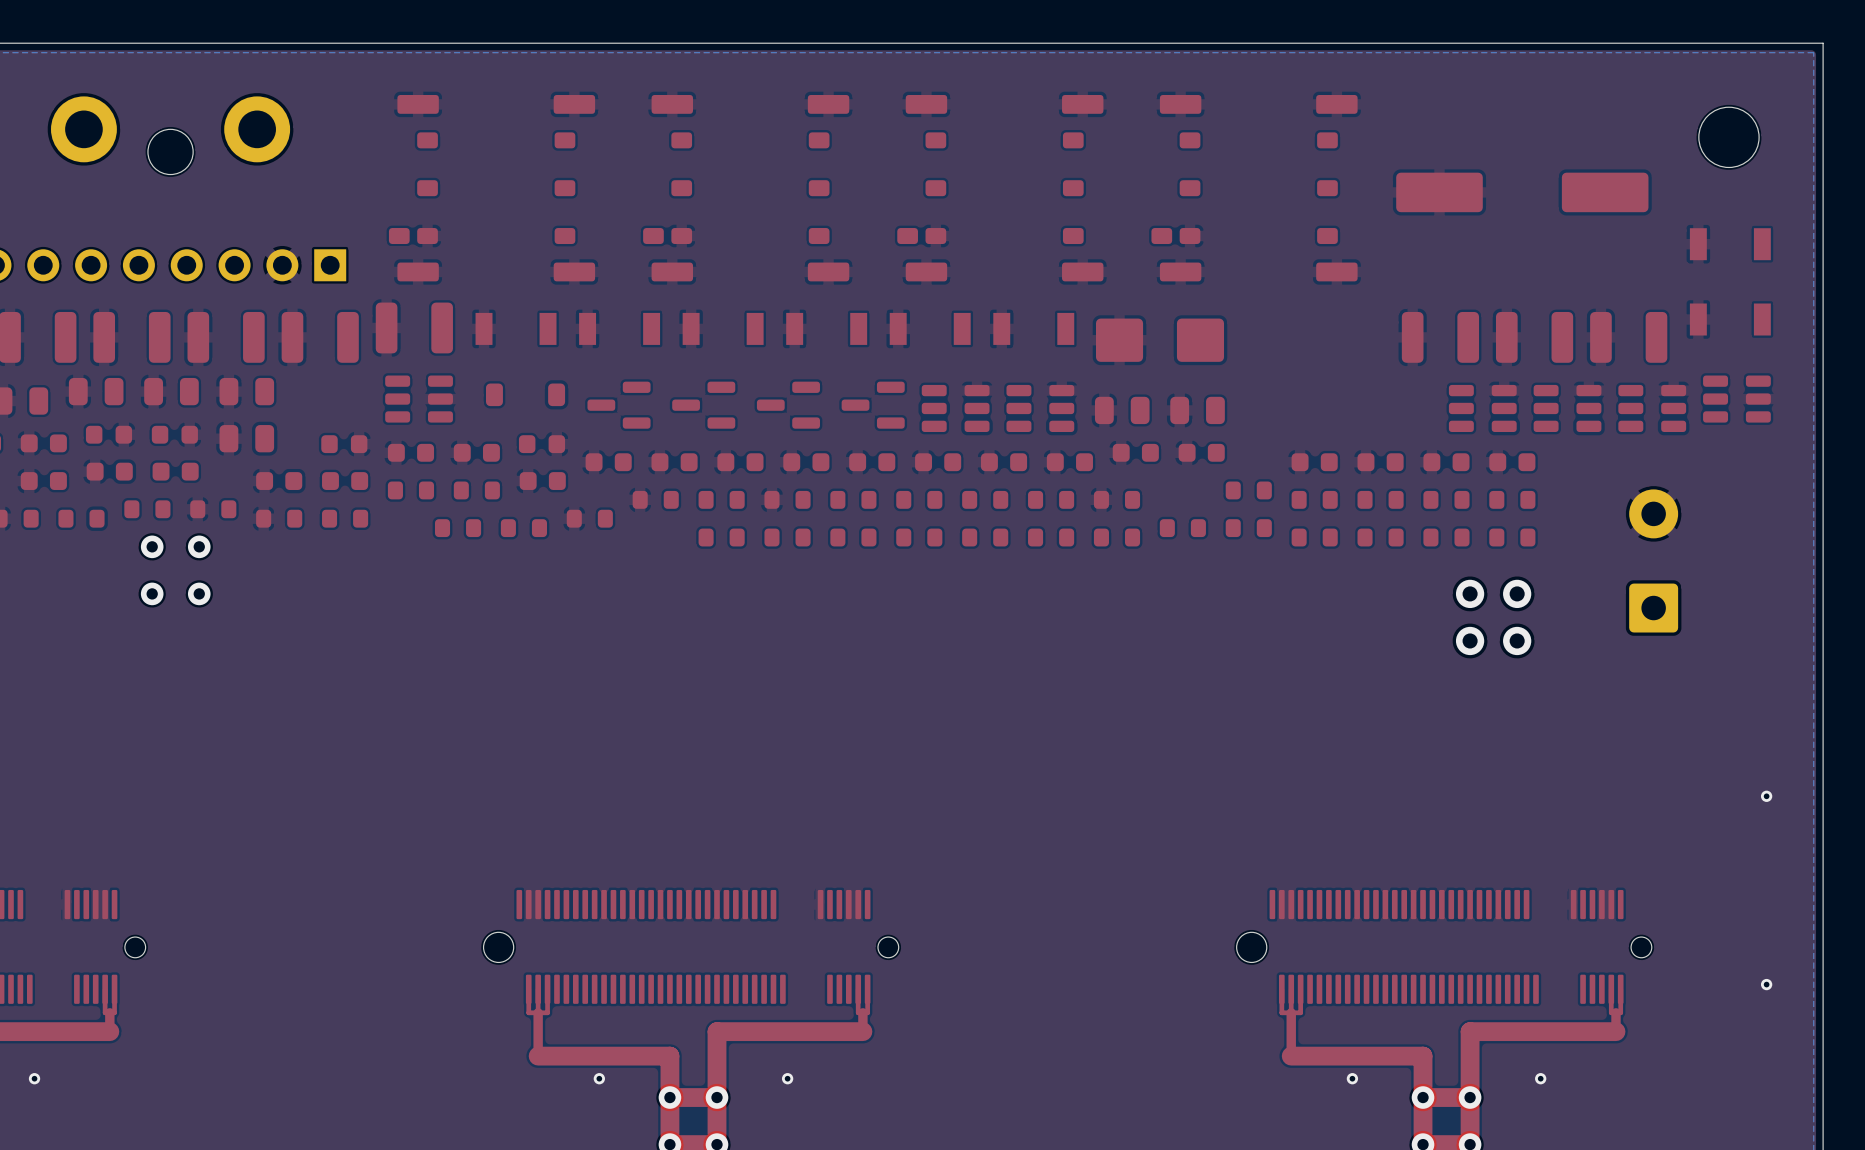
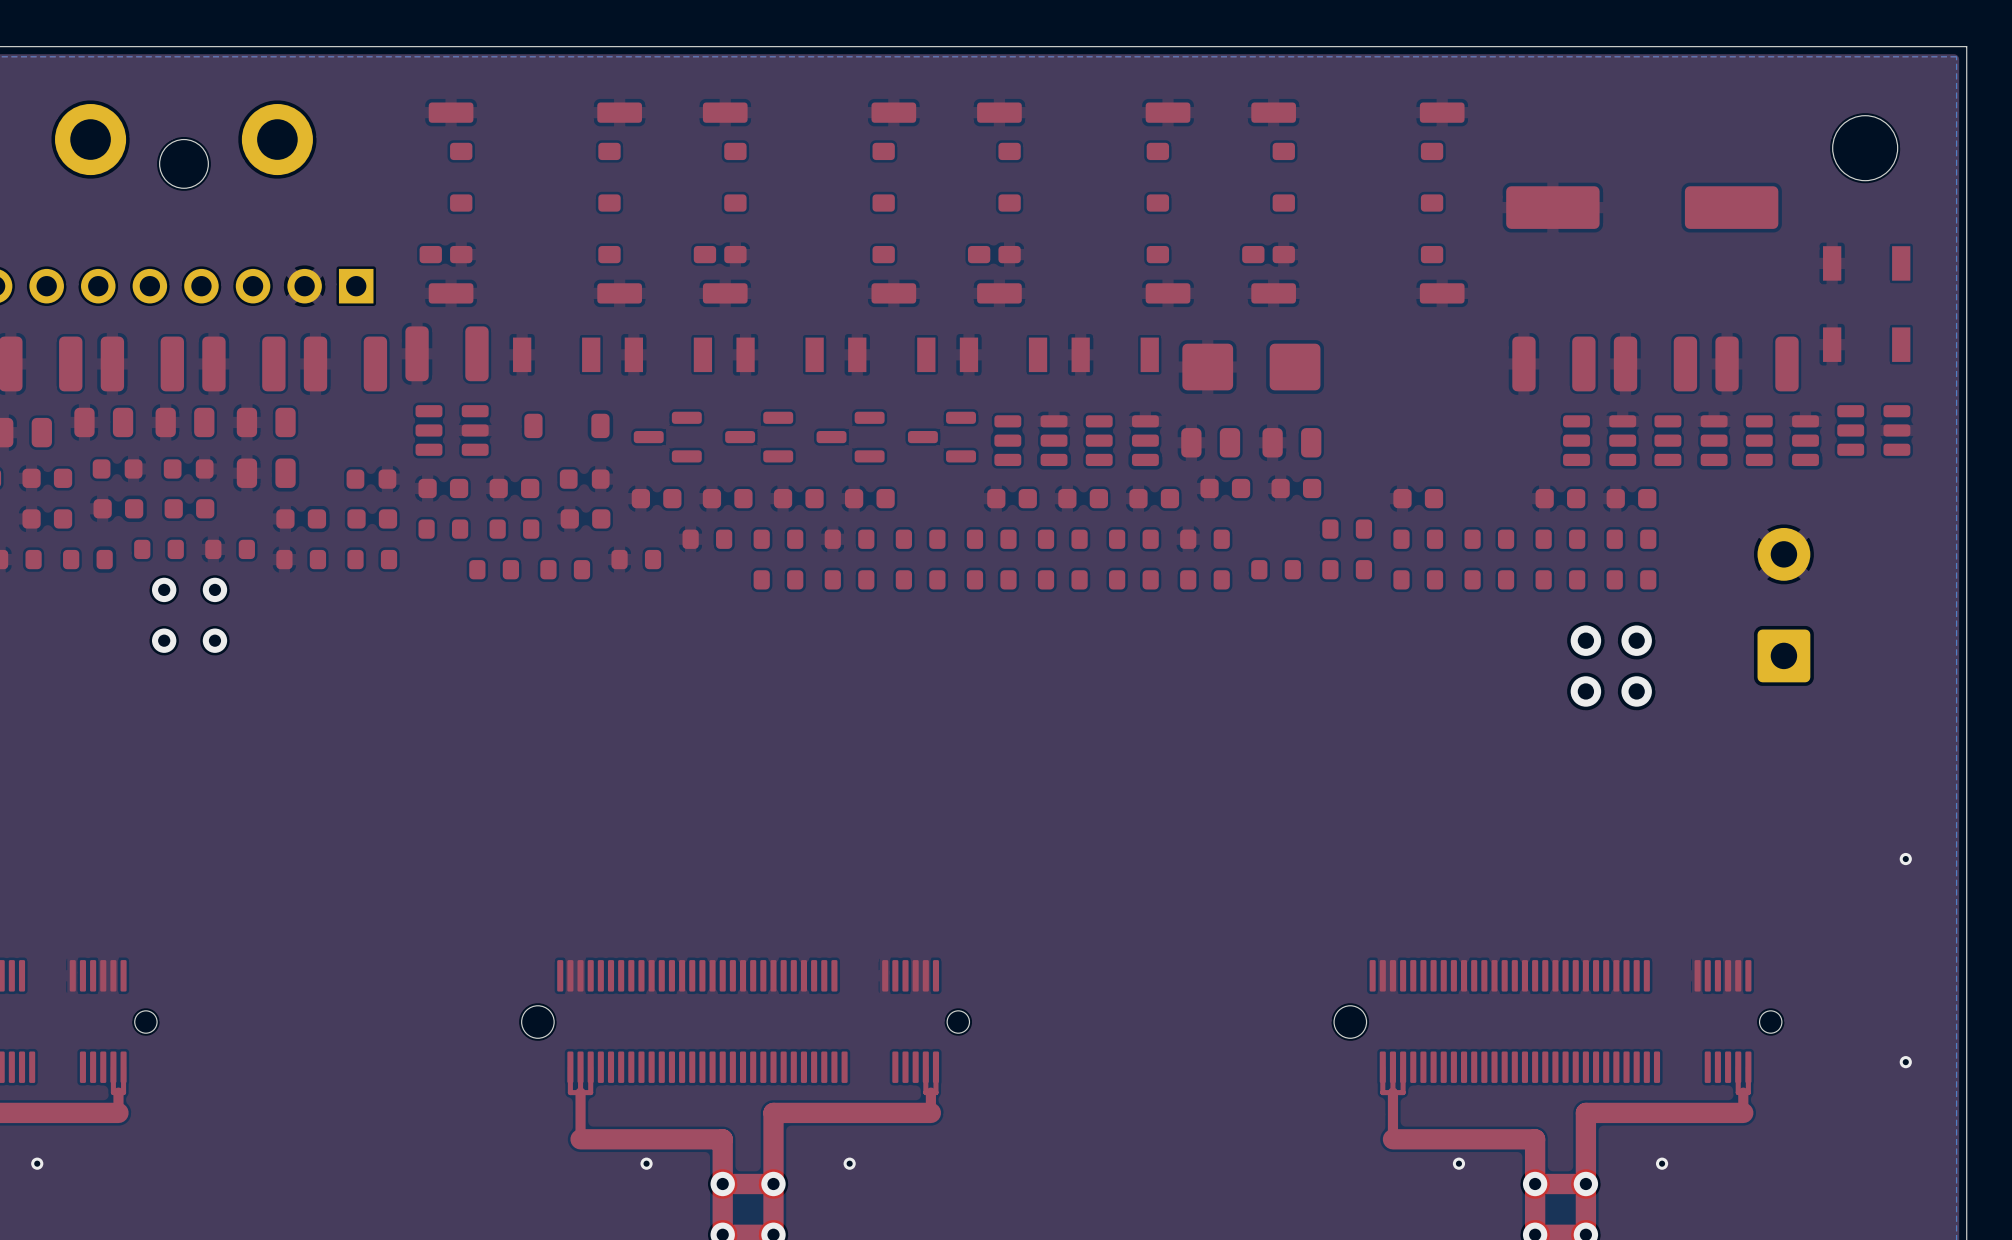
part: (872, 462) -> none
part: (1380, 462) -> none

